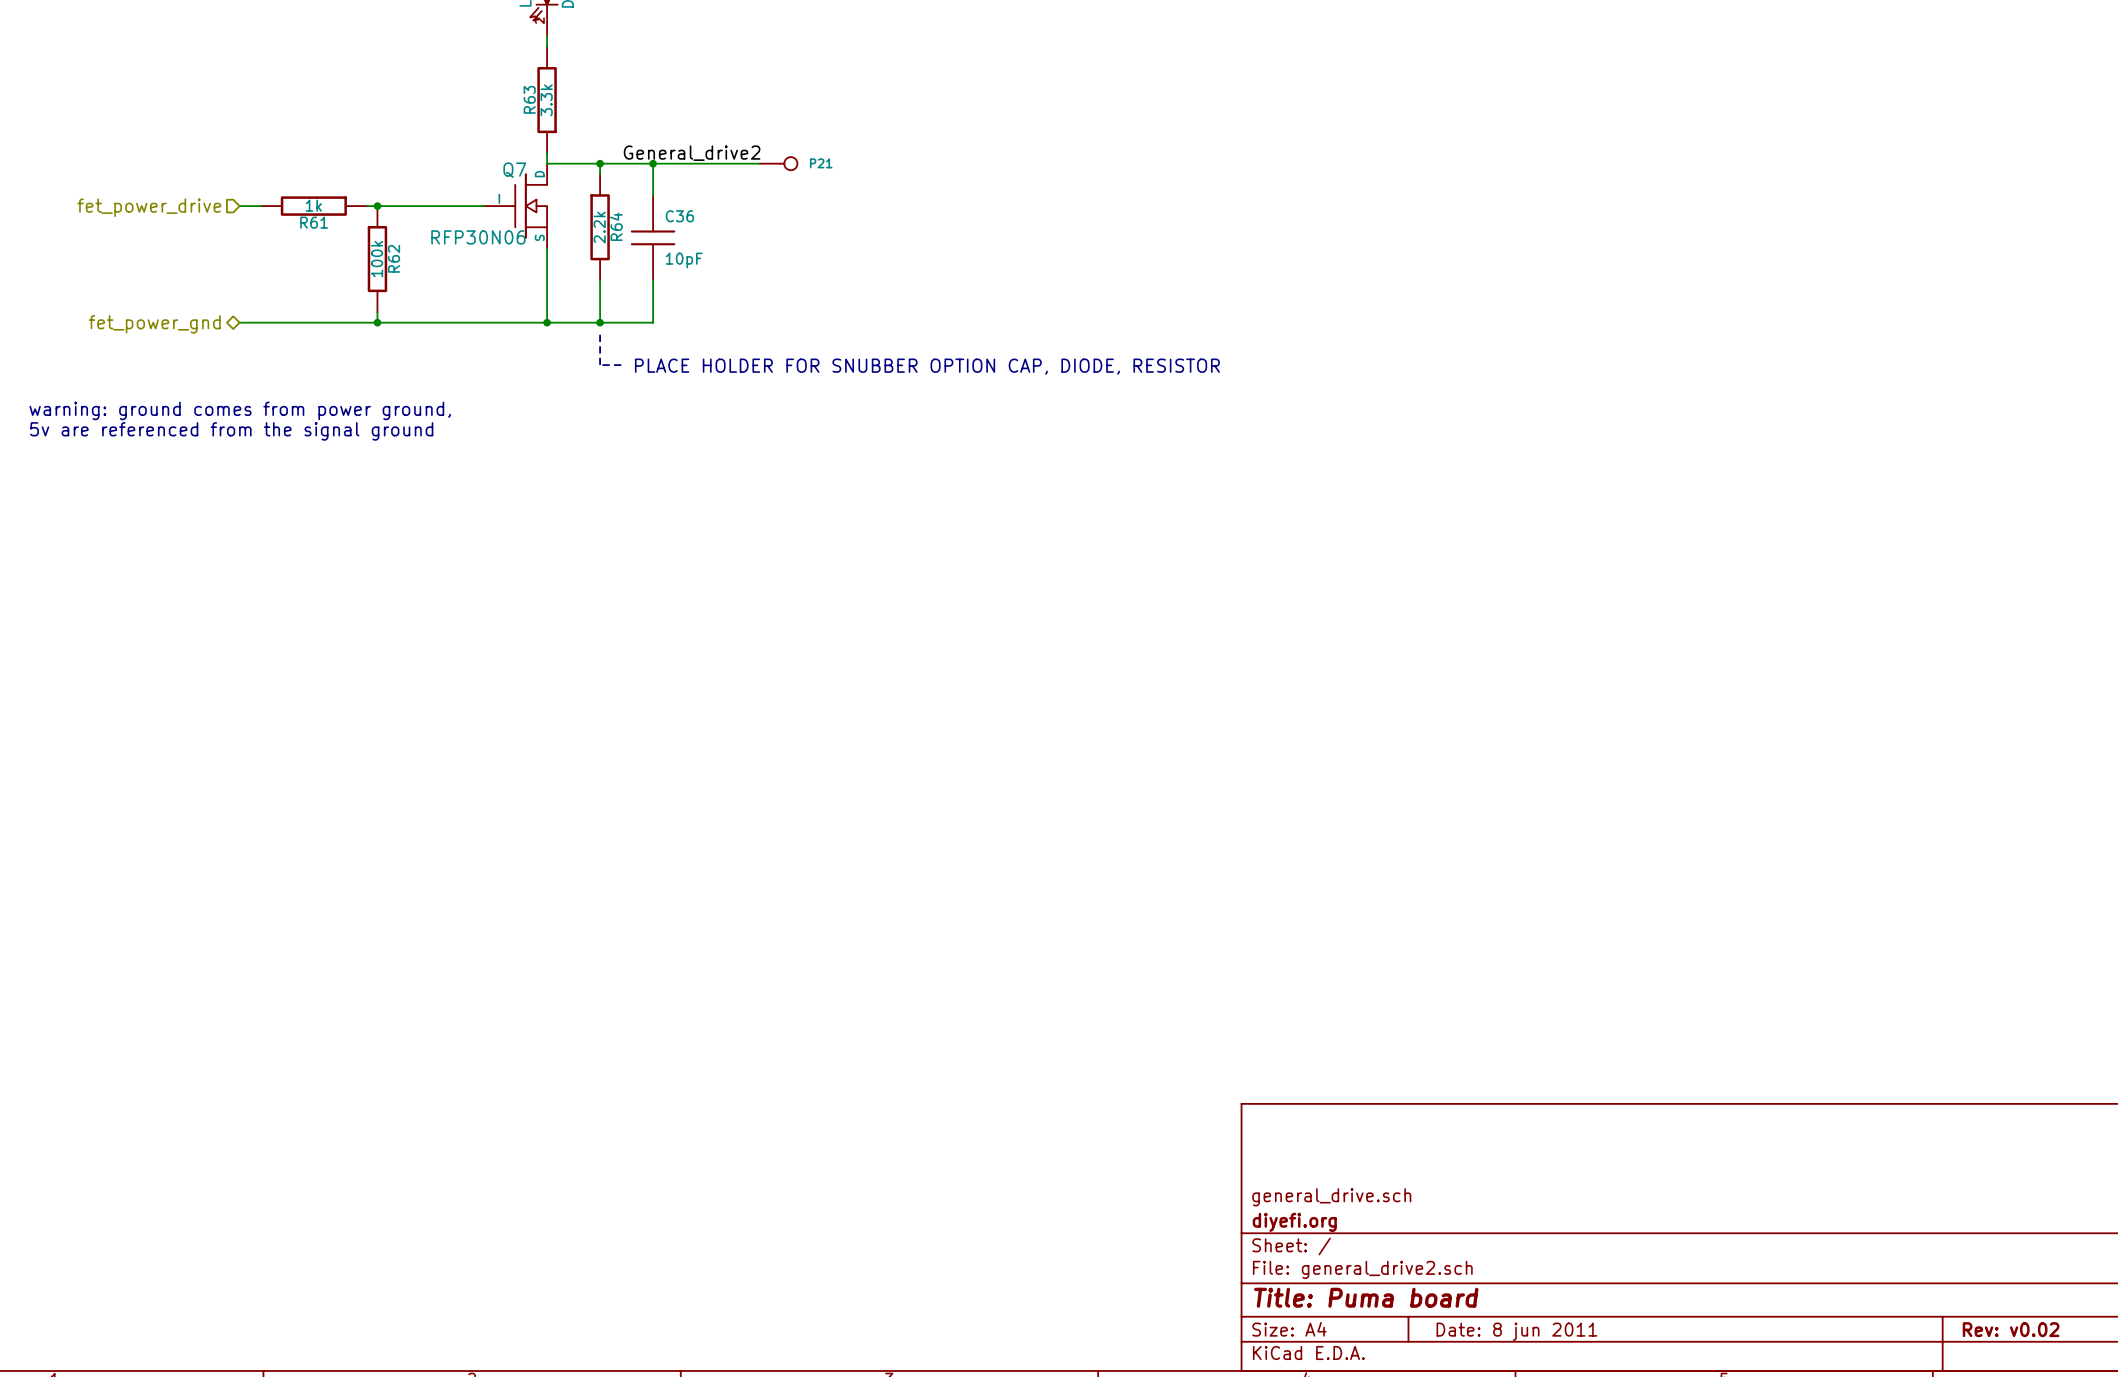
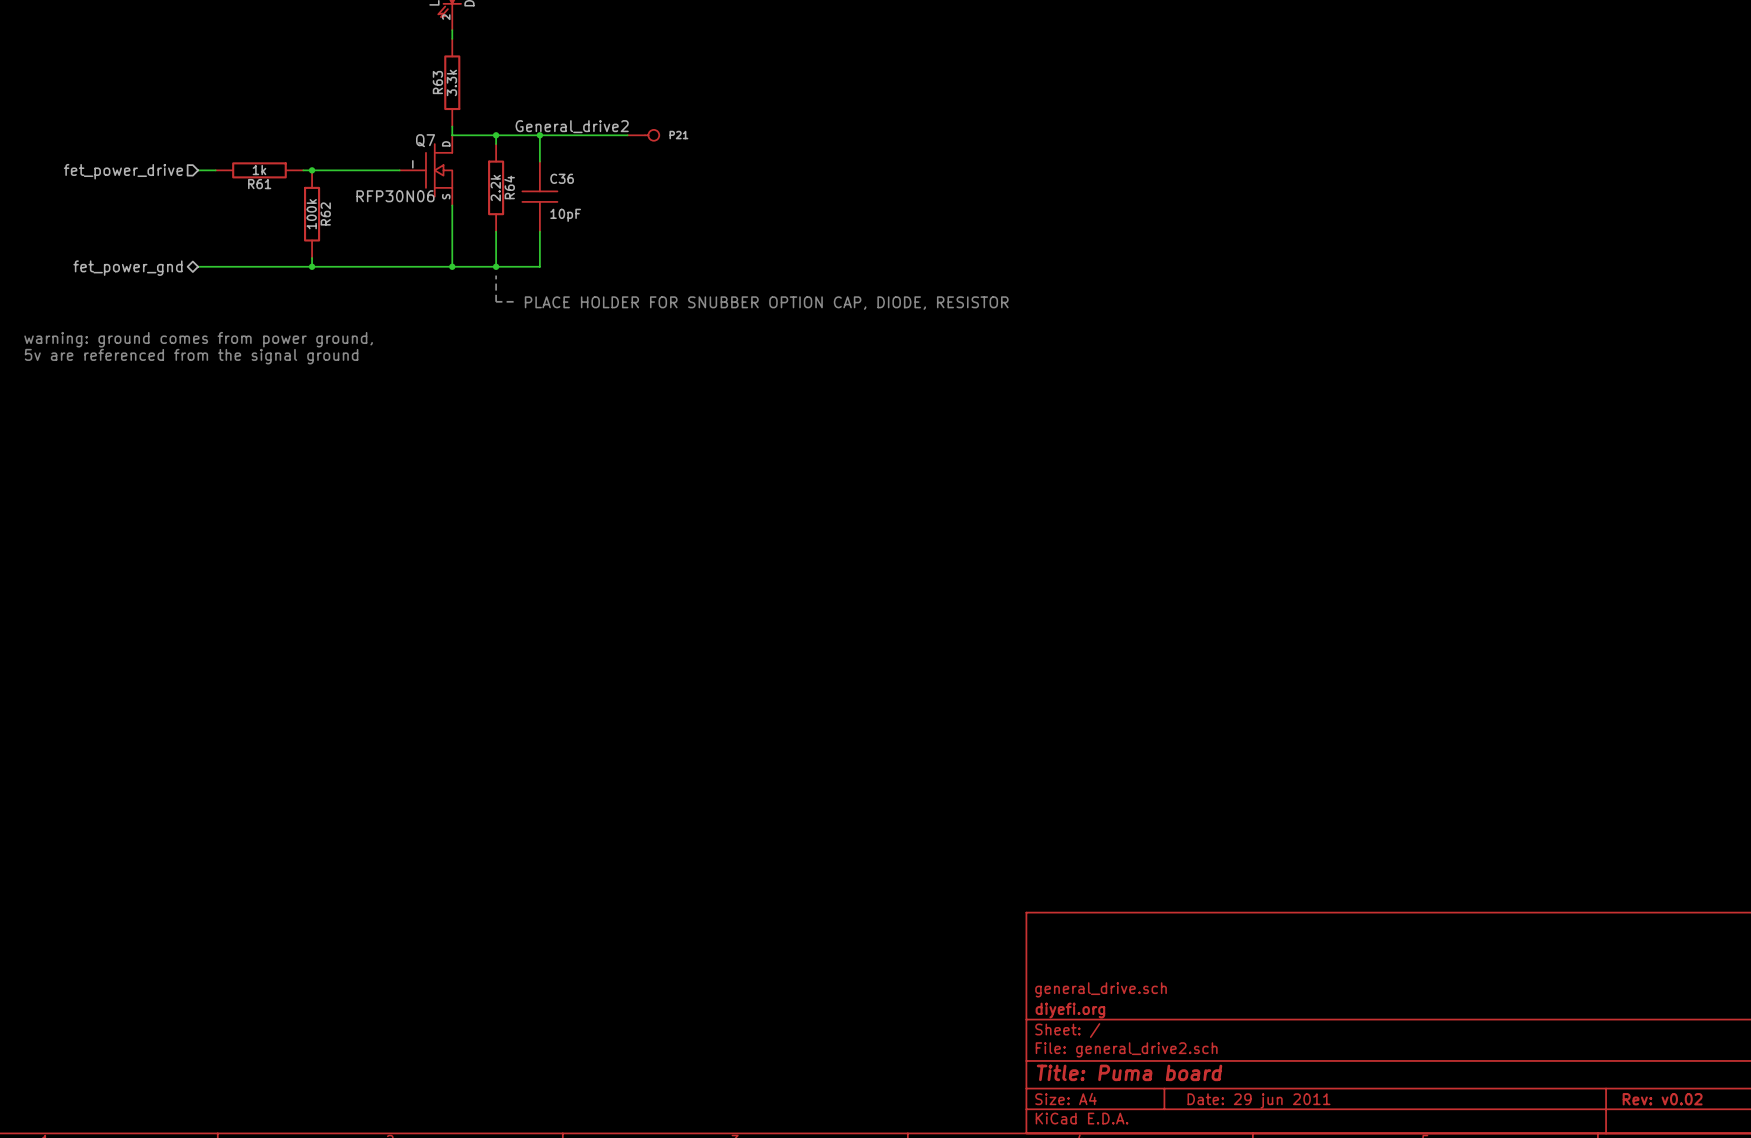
title block: Date: 8 jun 2011 (1516, 1331) -> Date: 29 jun 2011 (1259, 1100)

